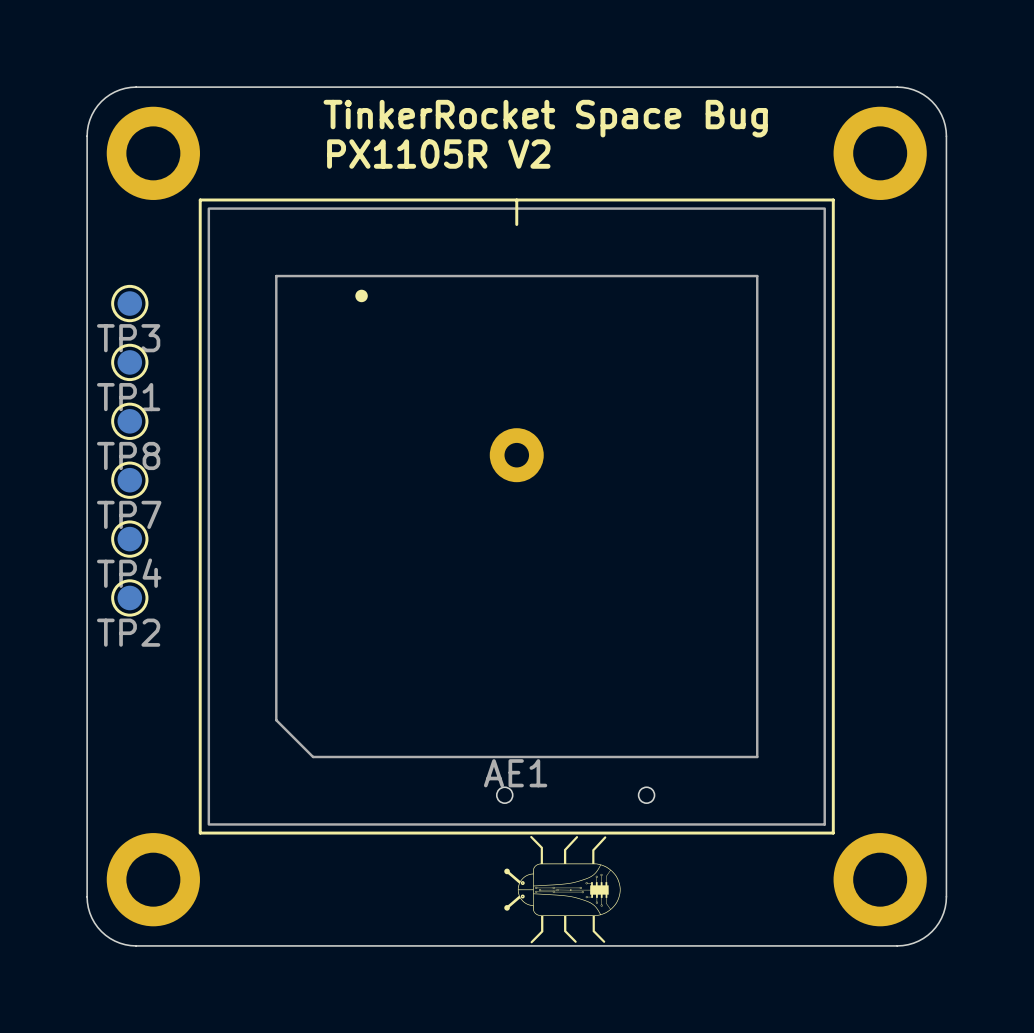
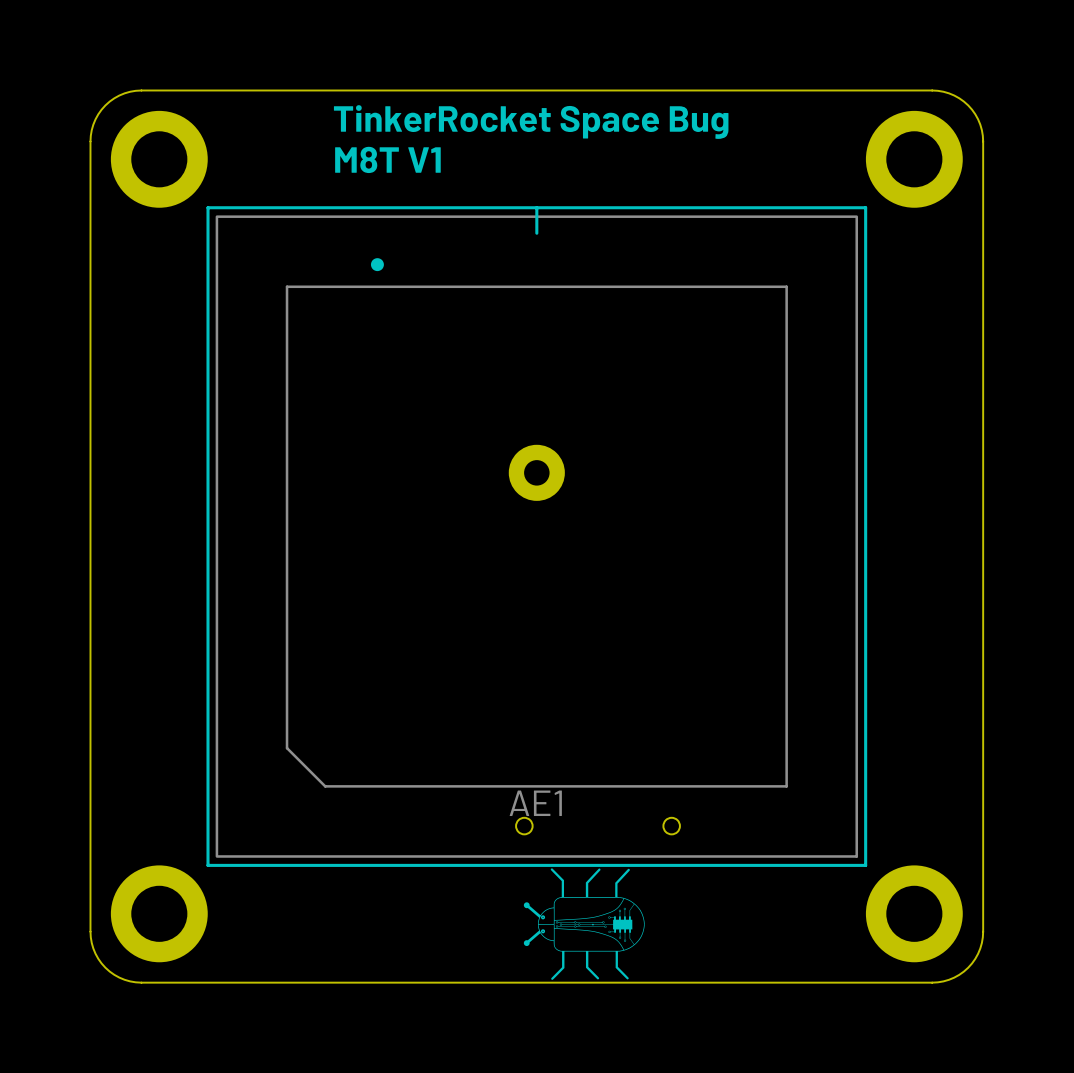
text: PX1105R V2 (438, 154) -> M8T V1 (387, 159)
part position: (361, 295) -> (377, 264)
TP3: (129, 303) -> none
TP1: (129, 362) -> none
TP8: (129, 421) -> none
TP7: (129, 480) -> none
TP4: (129, 539) -> none
TP2: (129, 597) -> none

